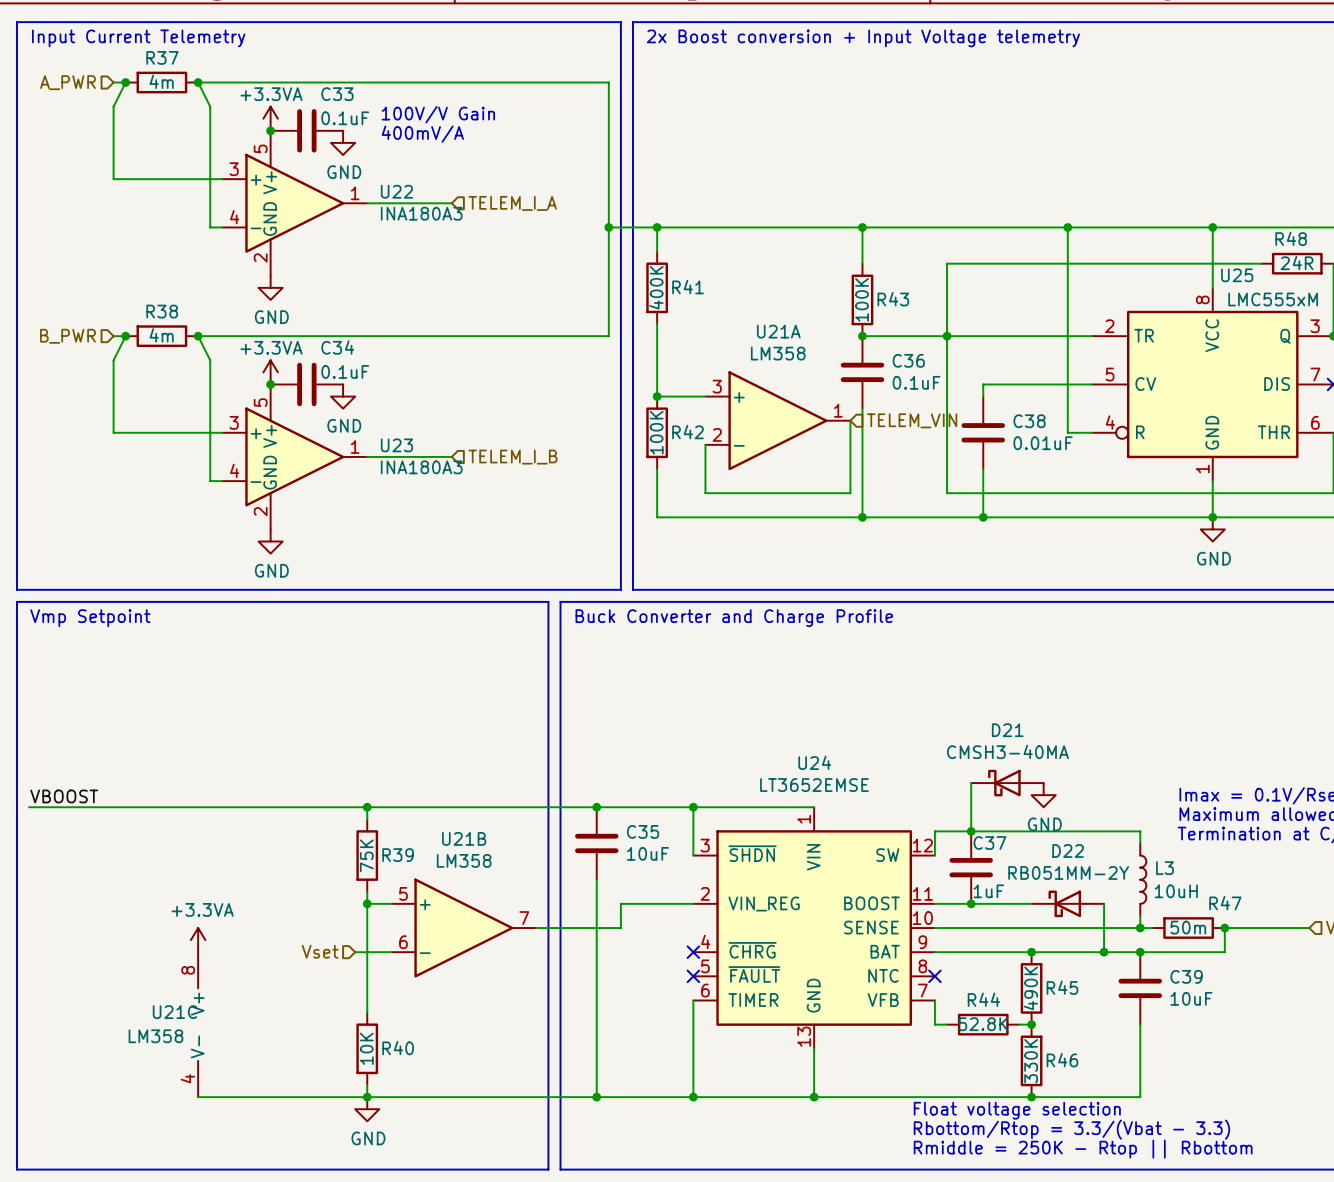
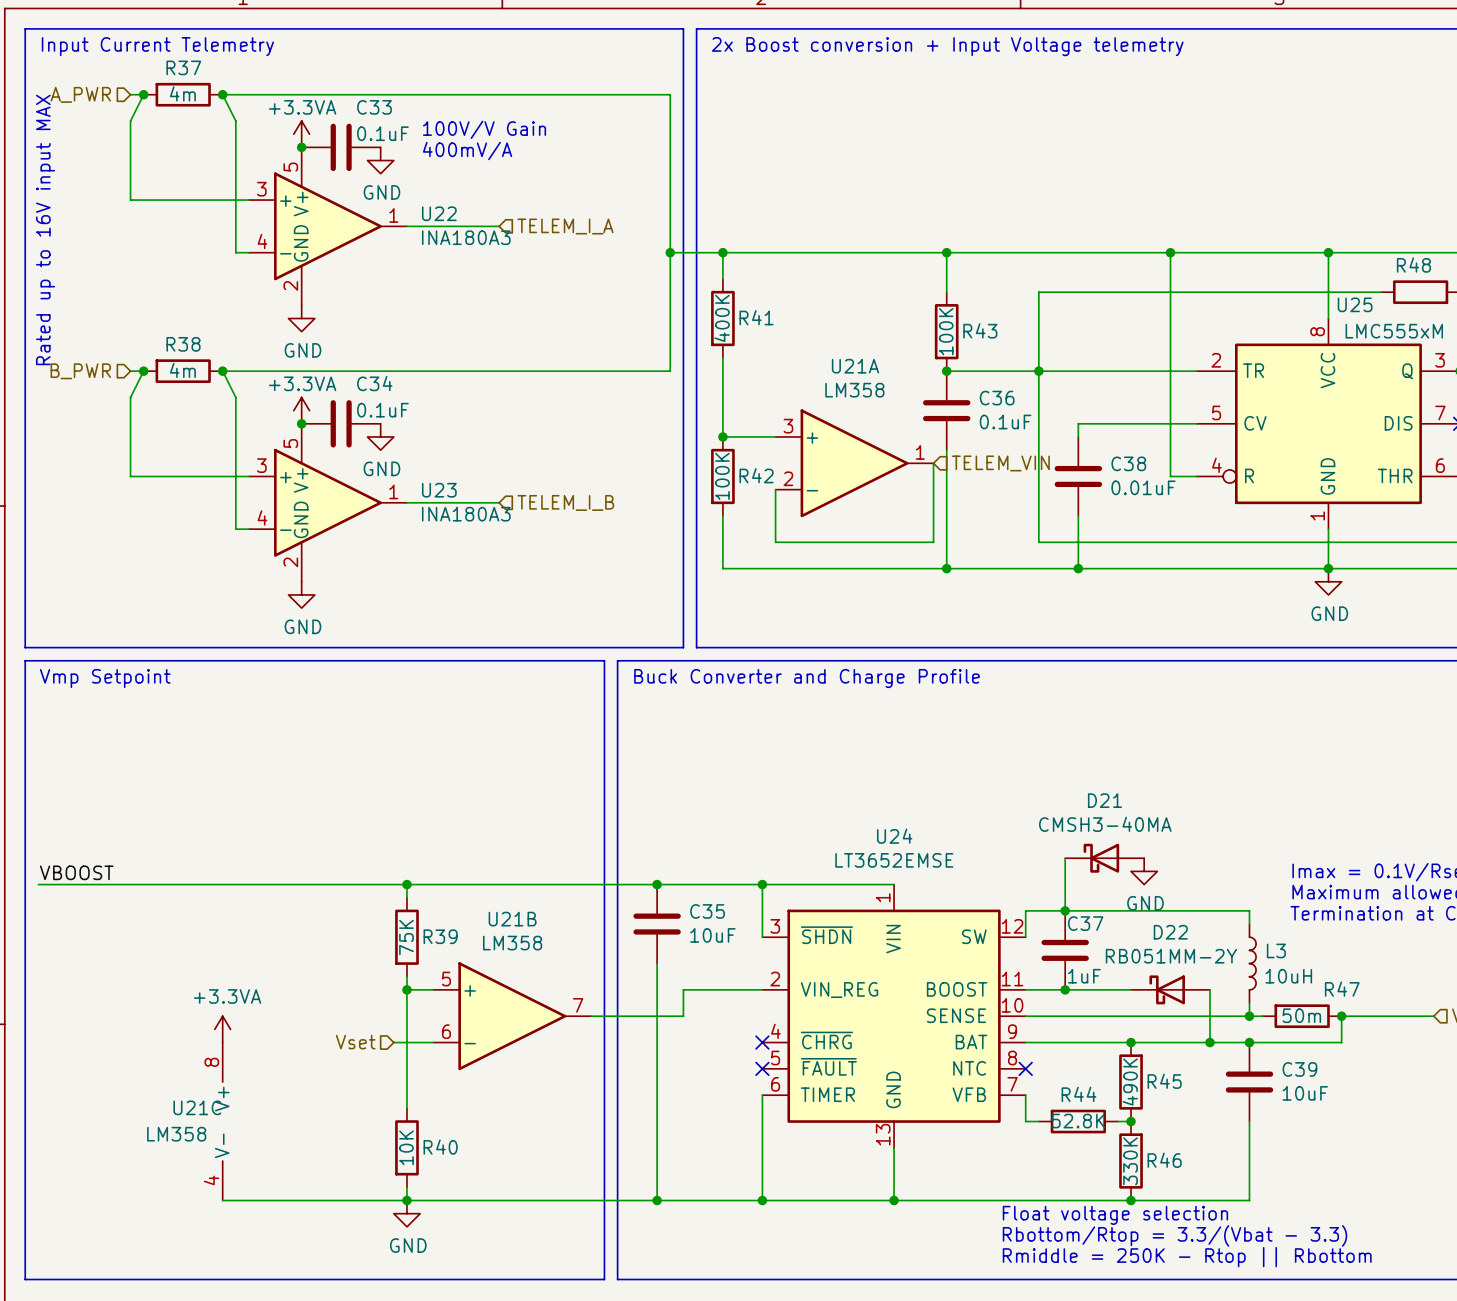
text: none -> Rated up to 16V input MAX (45, 229)
R48 value: 24R (1297, 262) -> none

